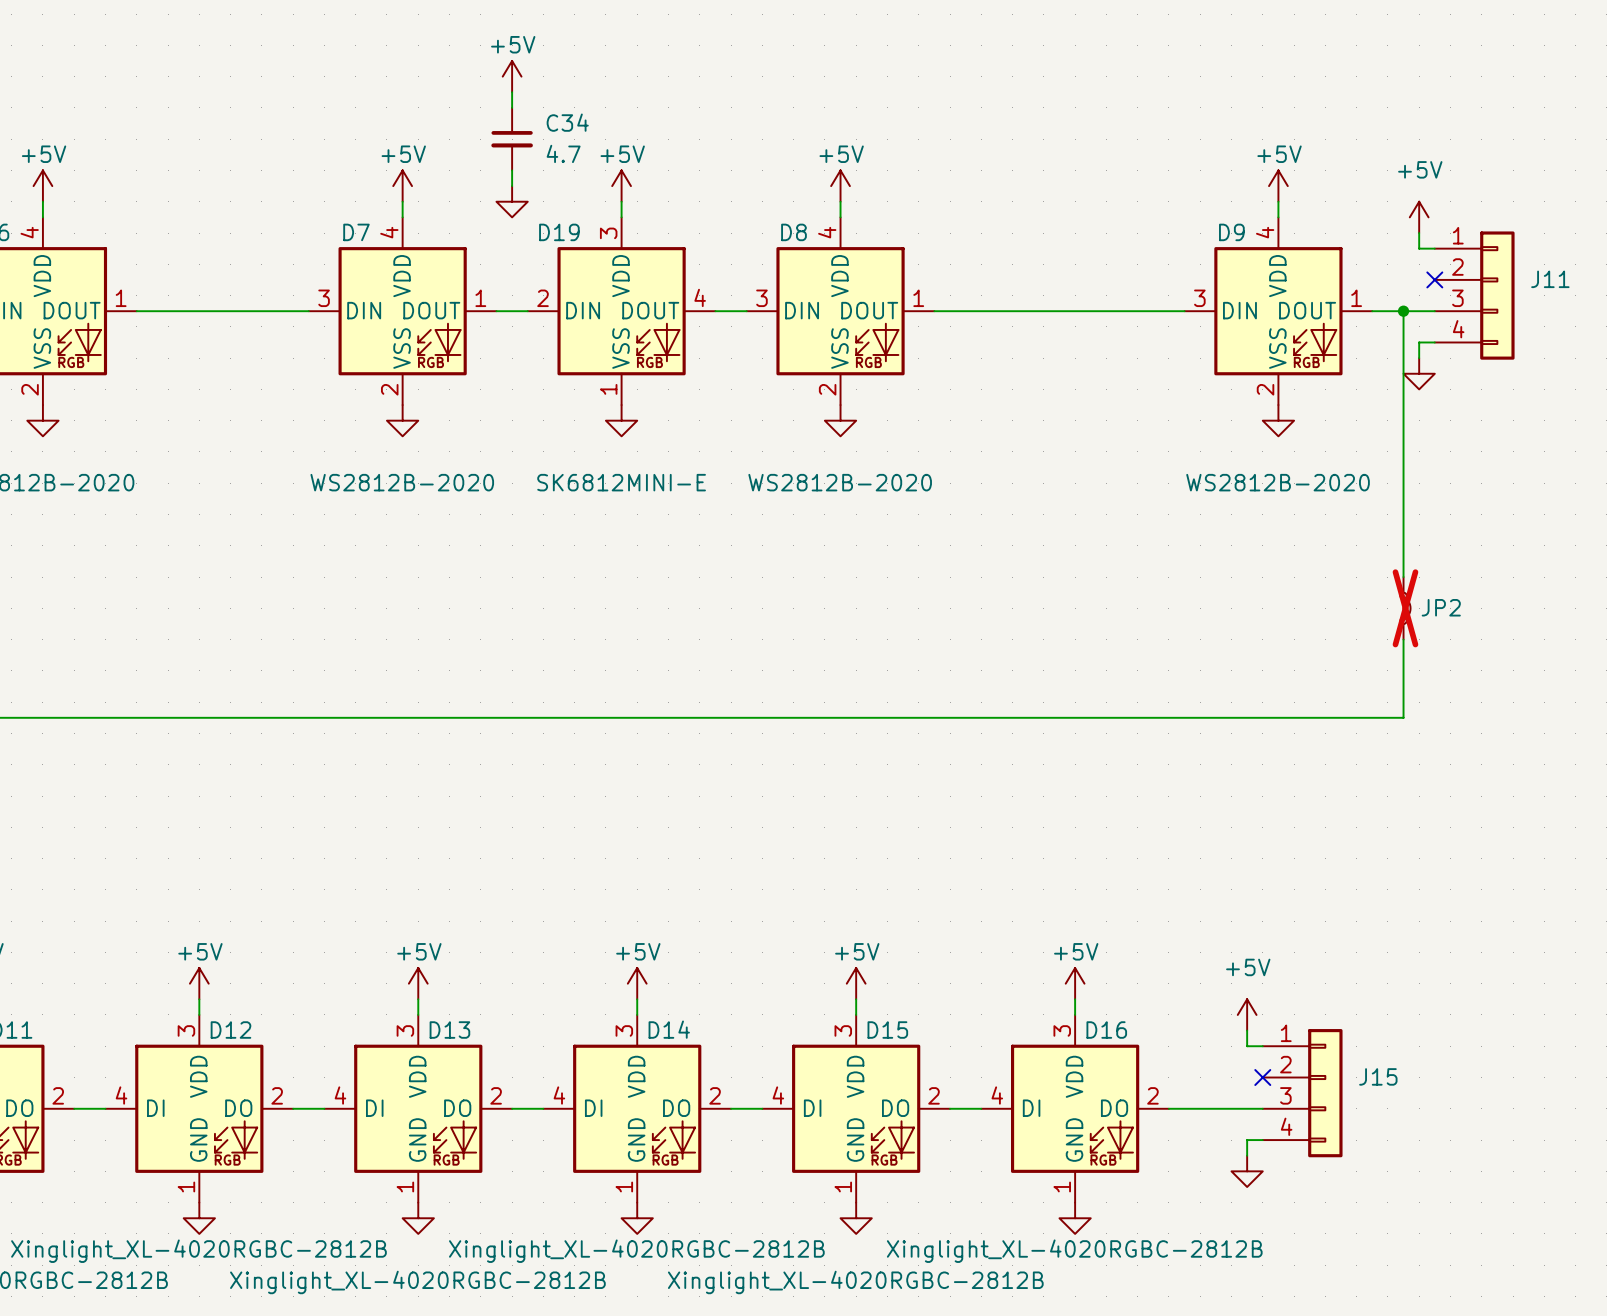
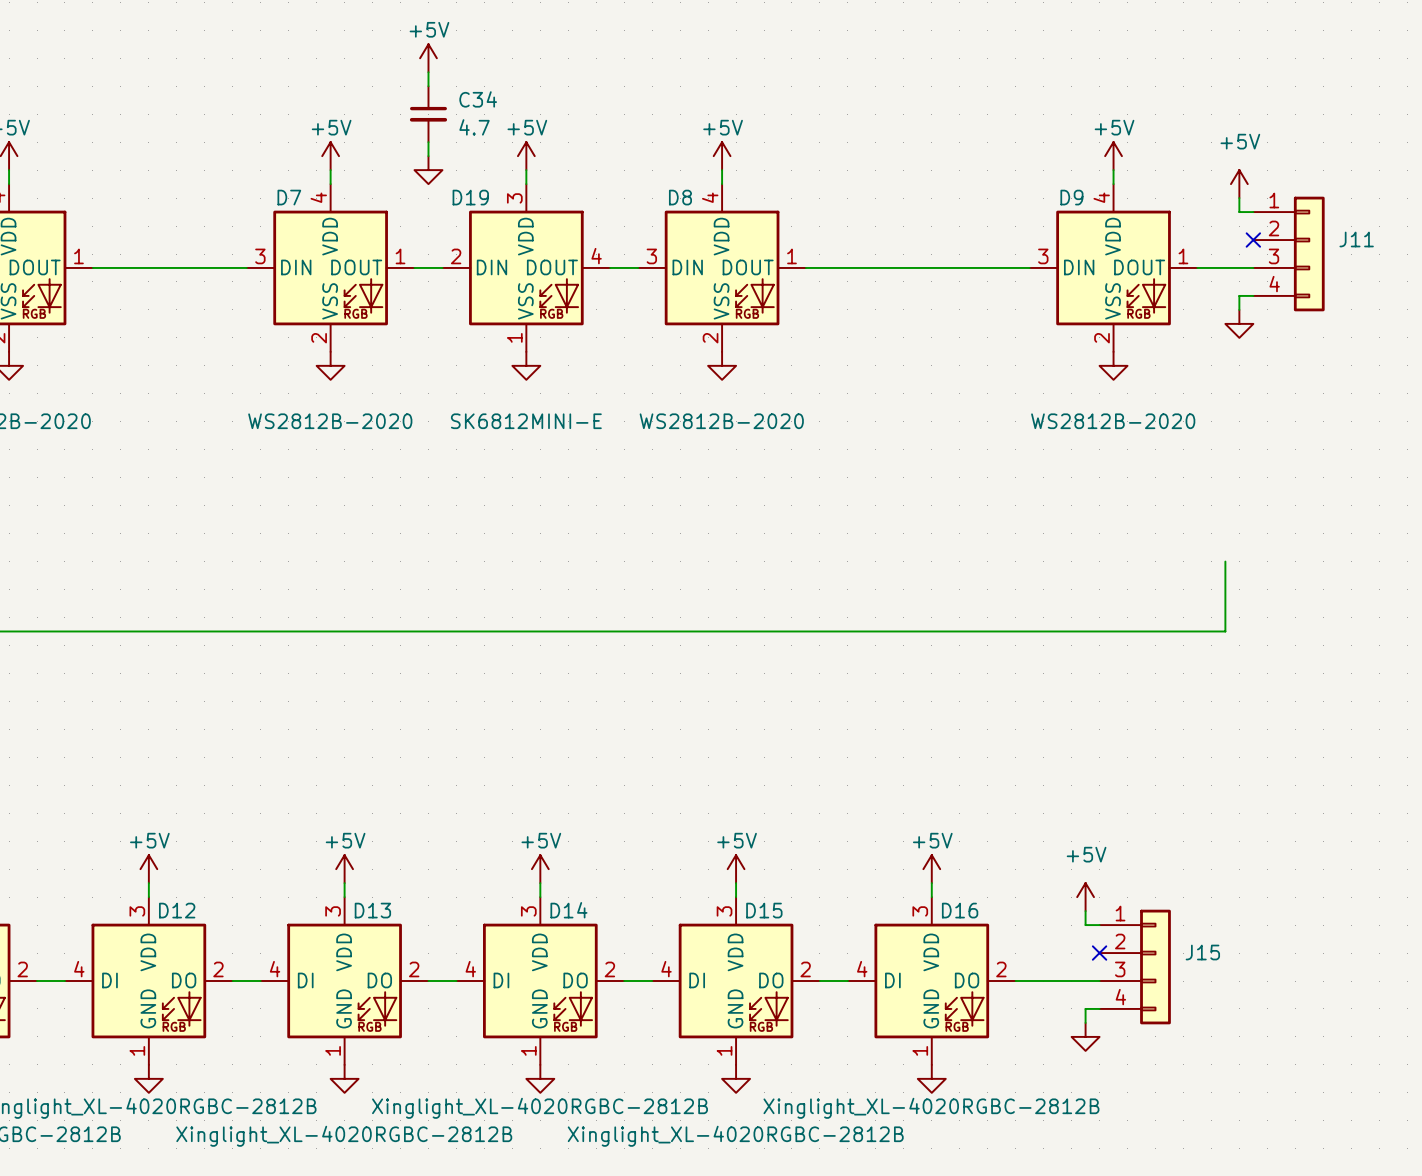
wire: (1403, 311) (1403, 577) -> none
junction: (1403, 311) -> none
JP2: (1405, 608) -> none

